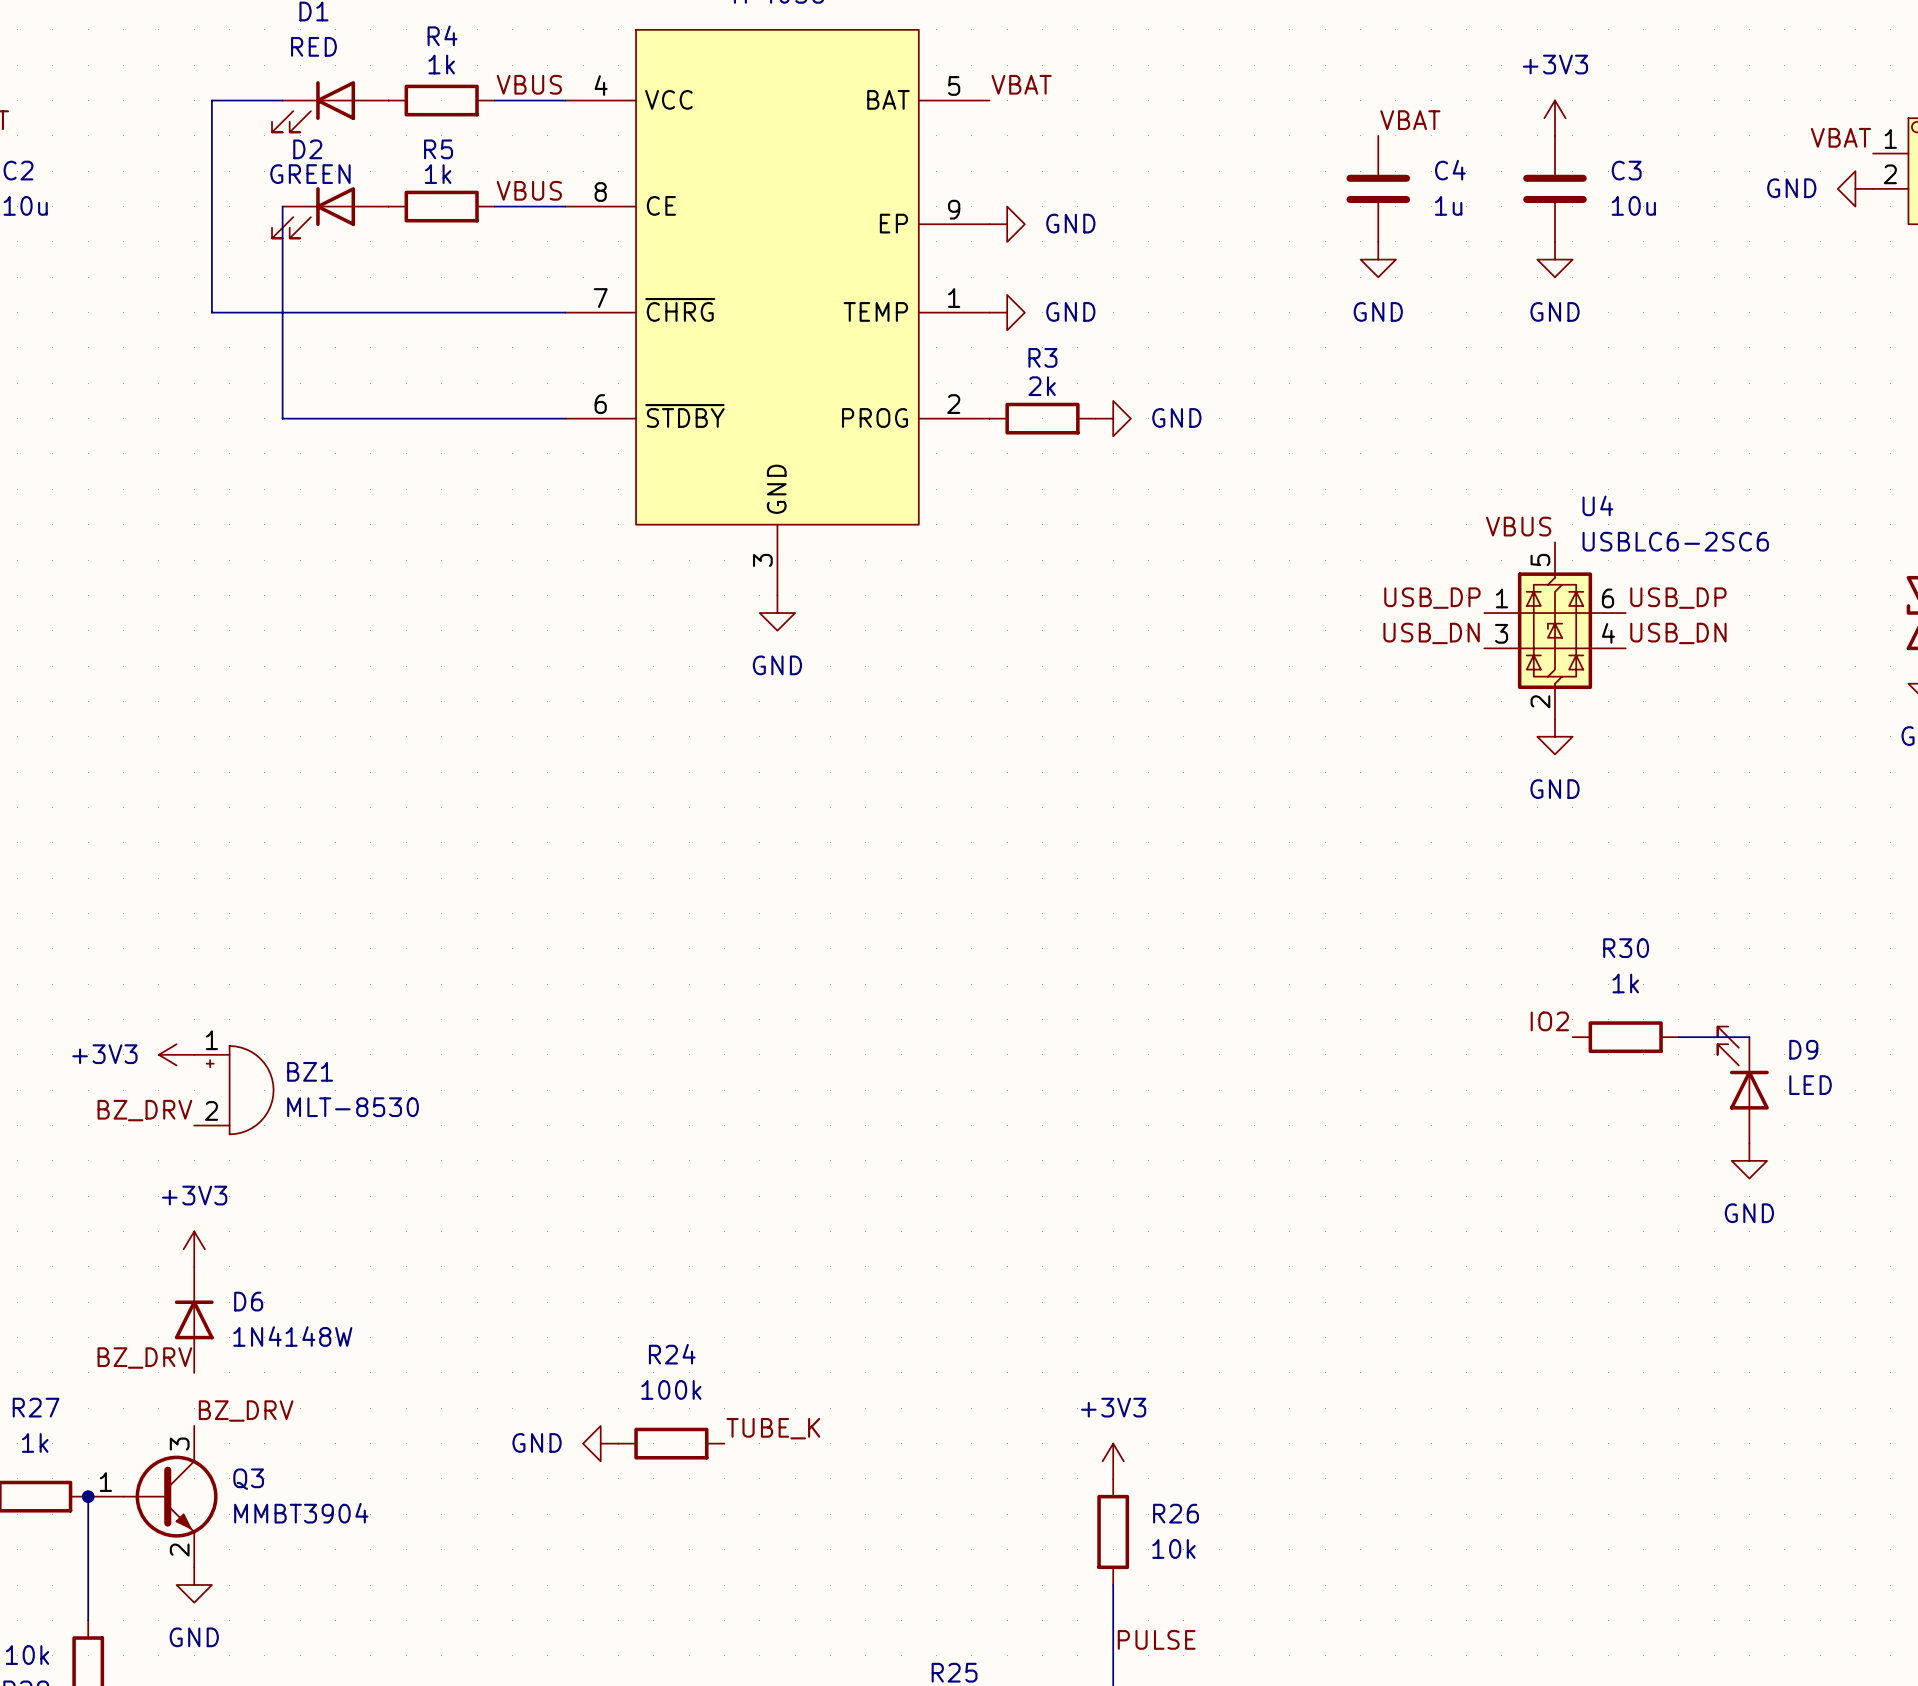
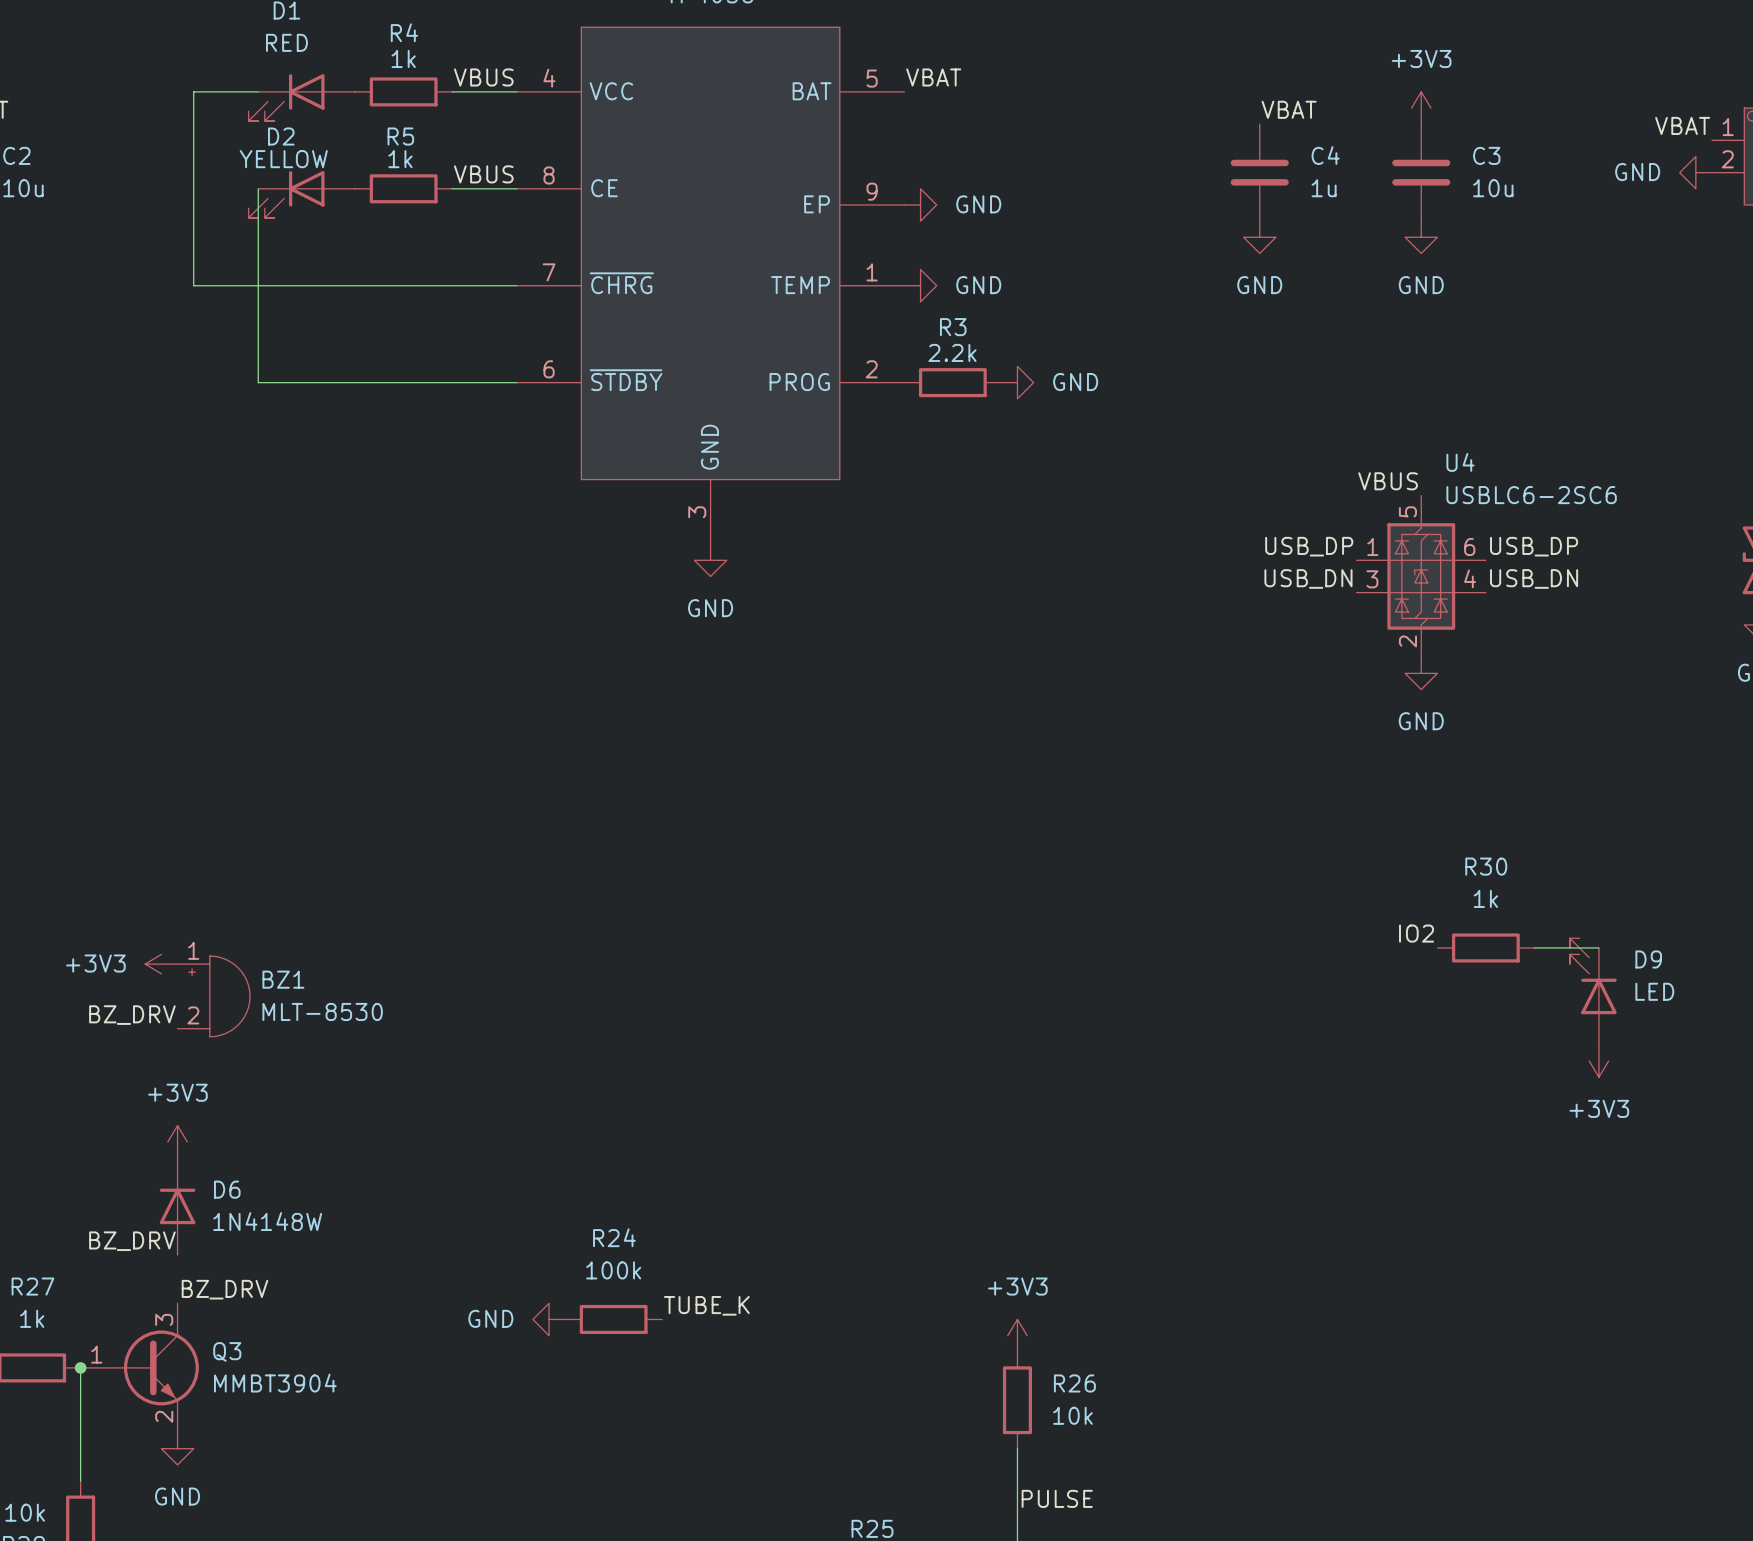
D2 value: GREEN (310, 174) -> YELLOW (283, 159)
R3 value: 2k (1042, 386) -> 2.2k (952, 352)
power symbol: GND (1749, 1160) -> +3V3 (1598, 1061)

